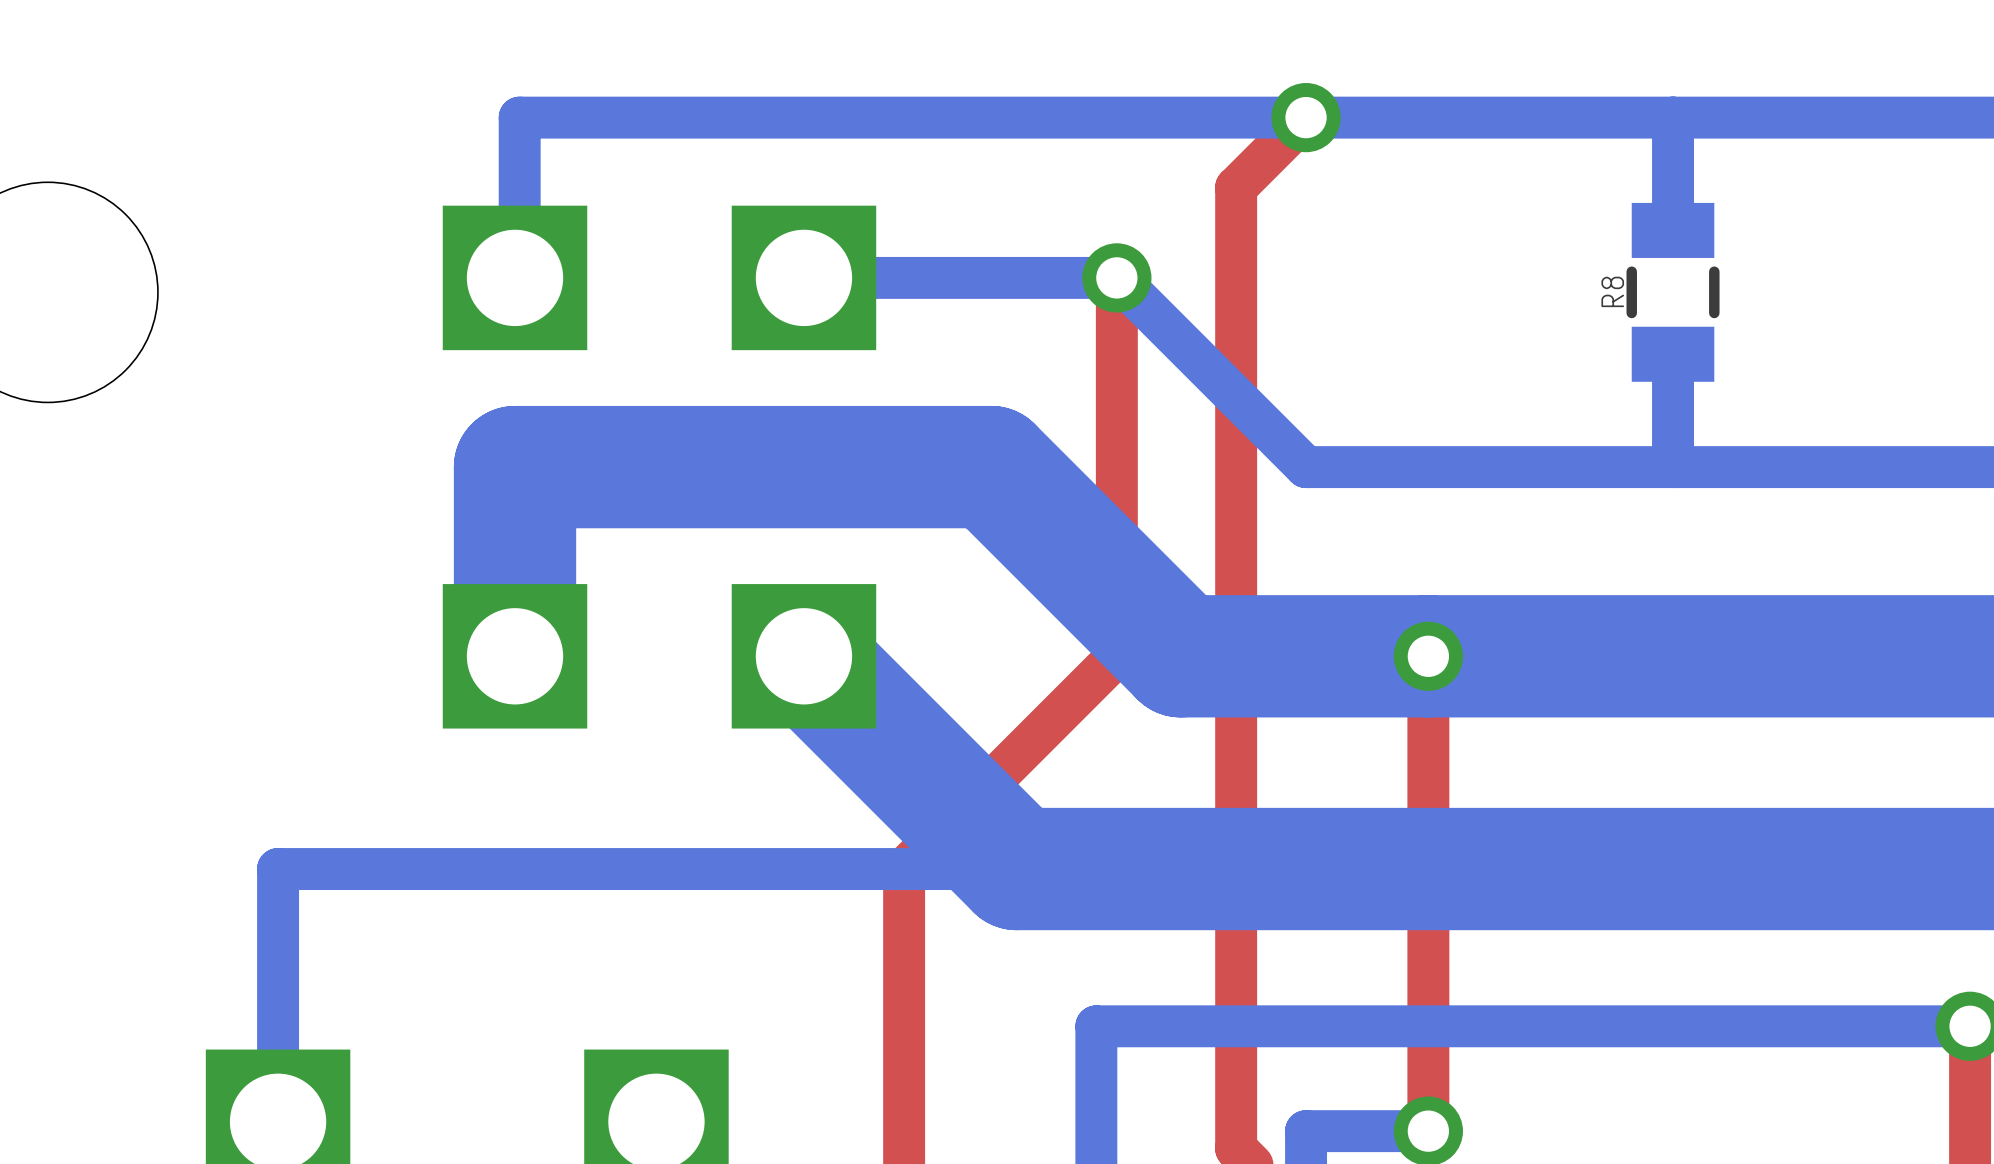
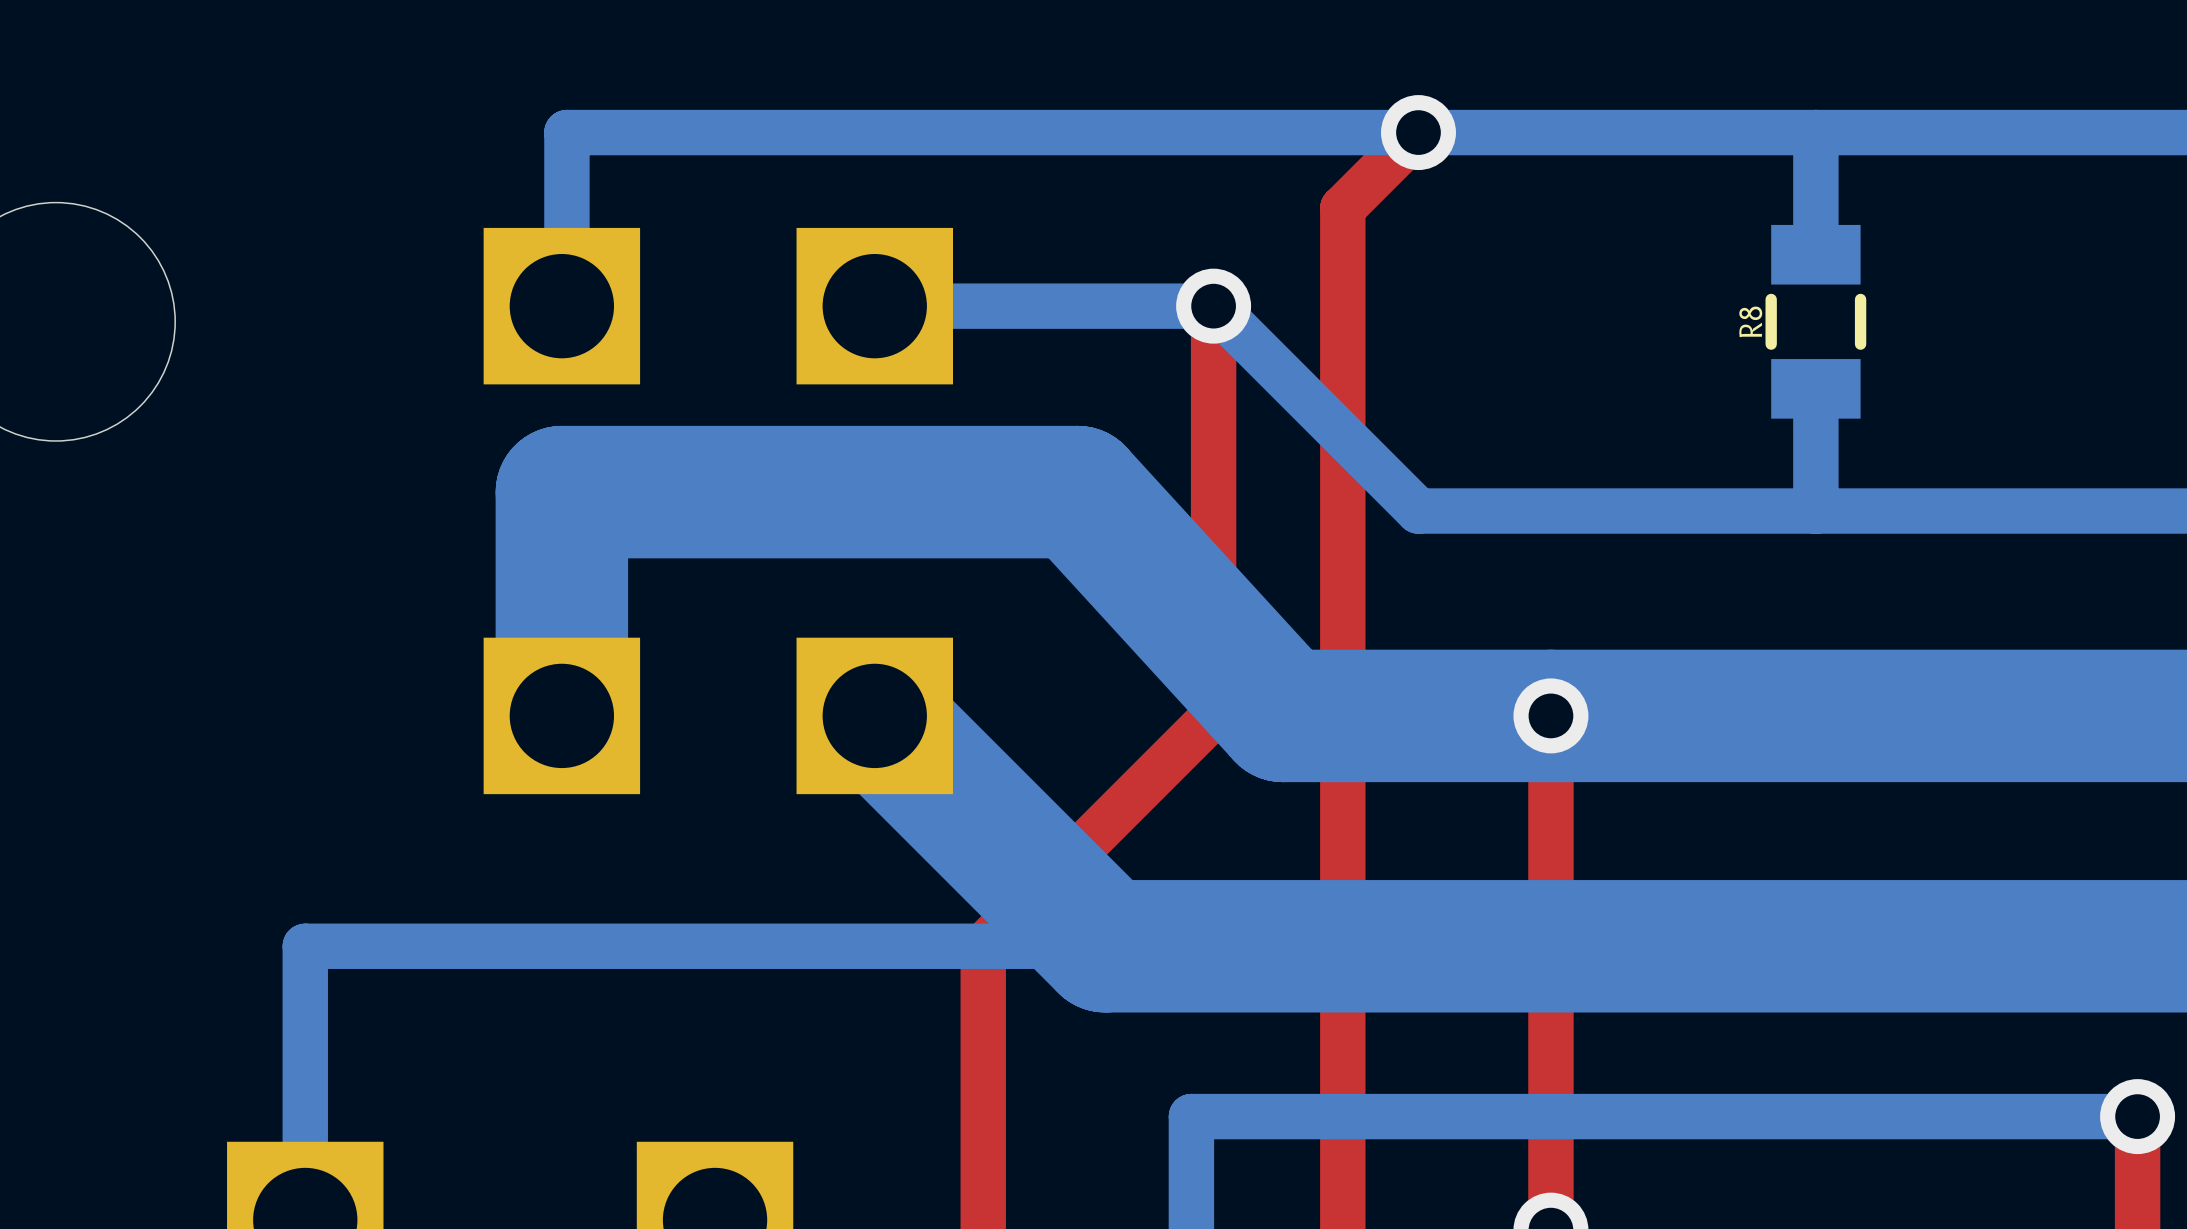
bottom track: (515, 467) (991, 467) (1180, 656) -> (561, 511) (561, 492) (1077, 492) (1282, 715)

